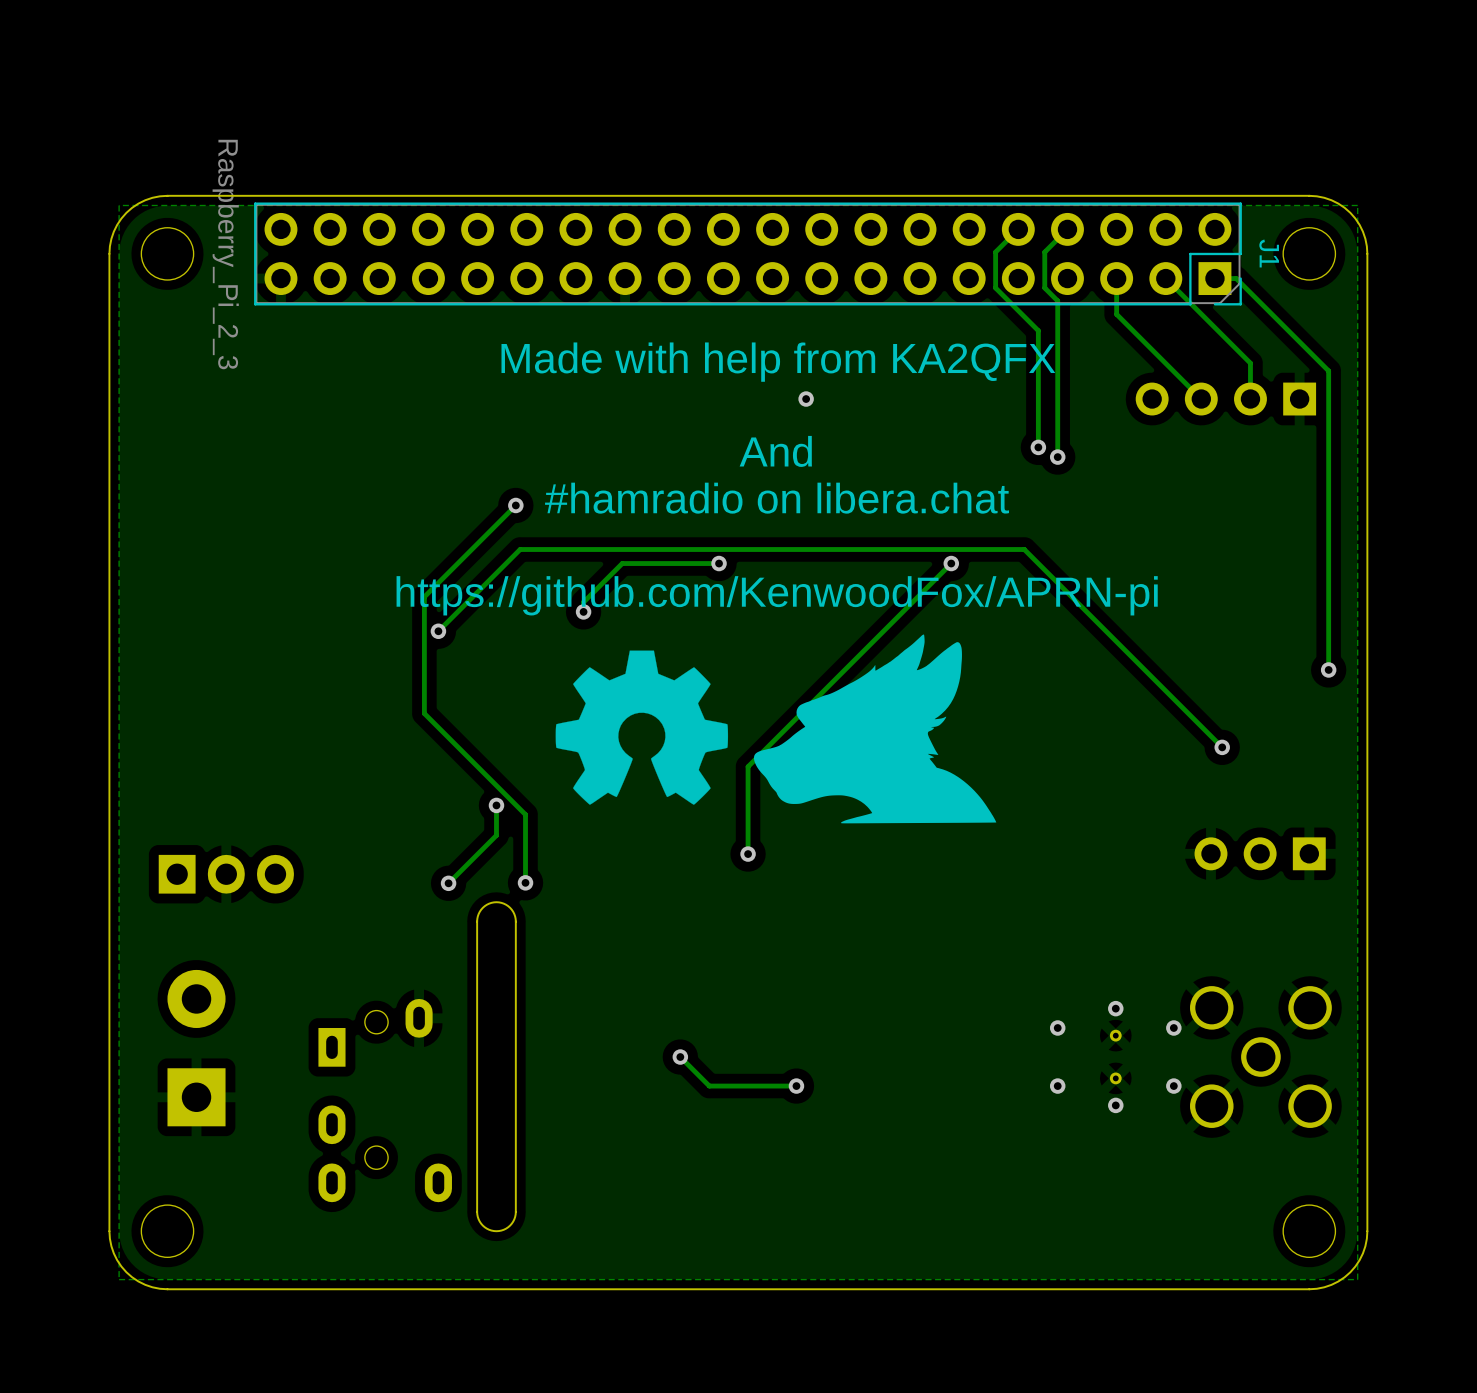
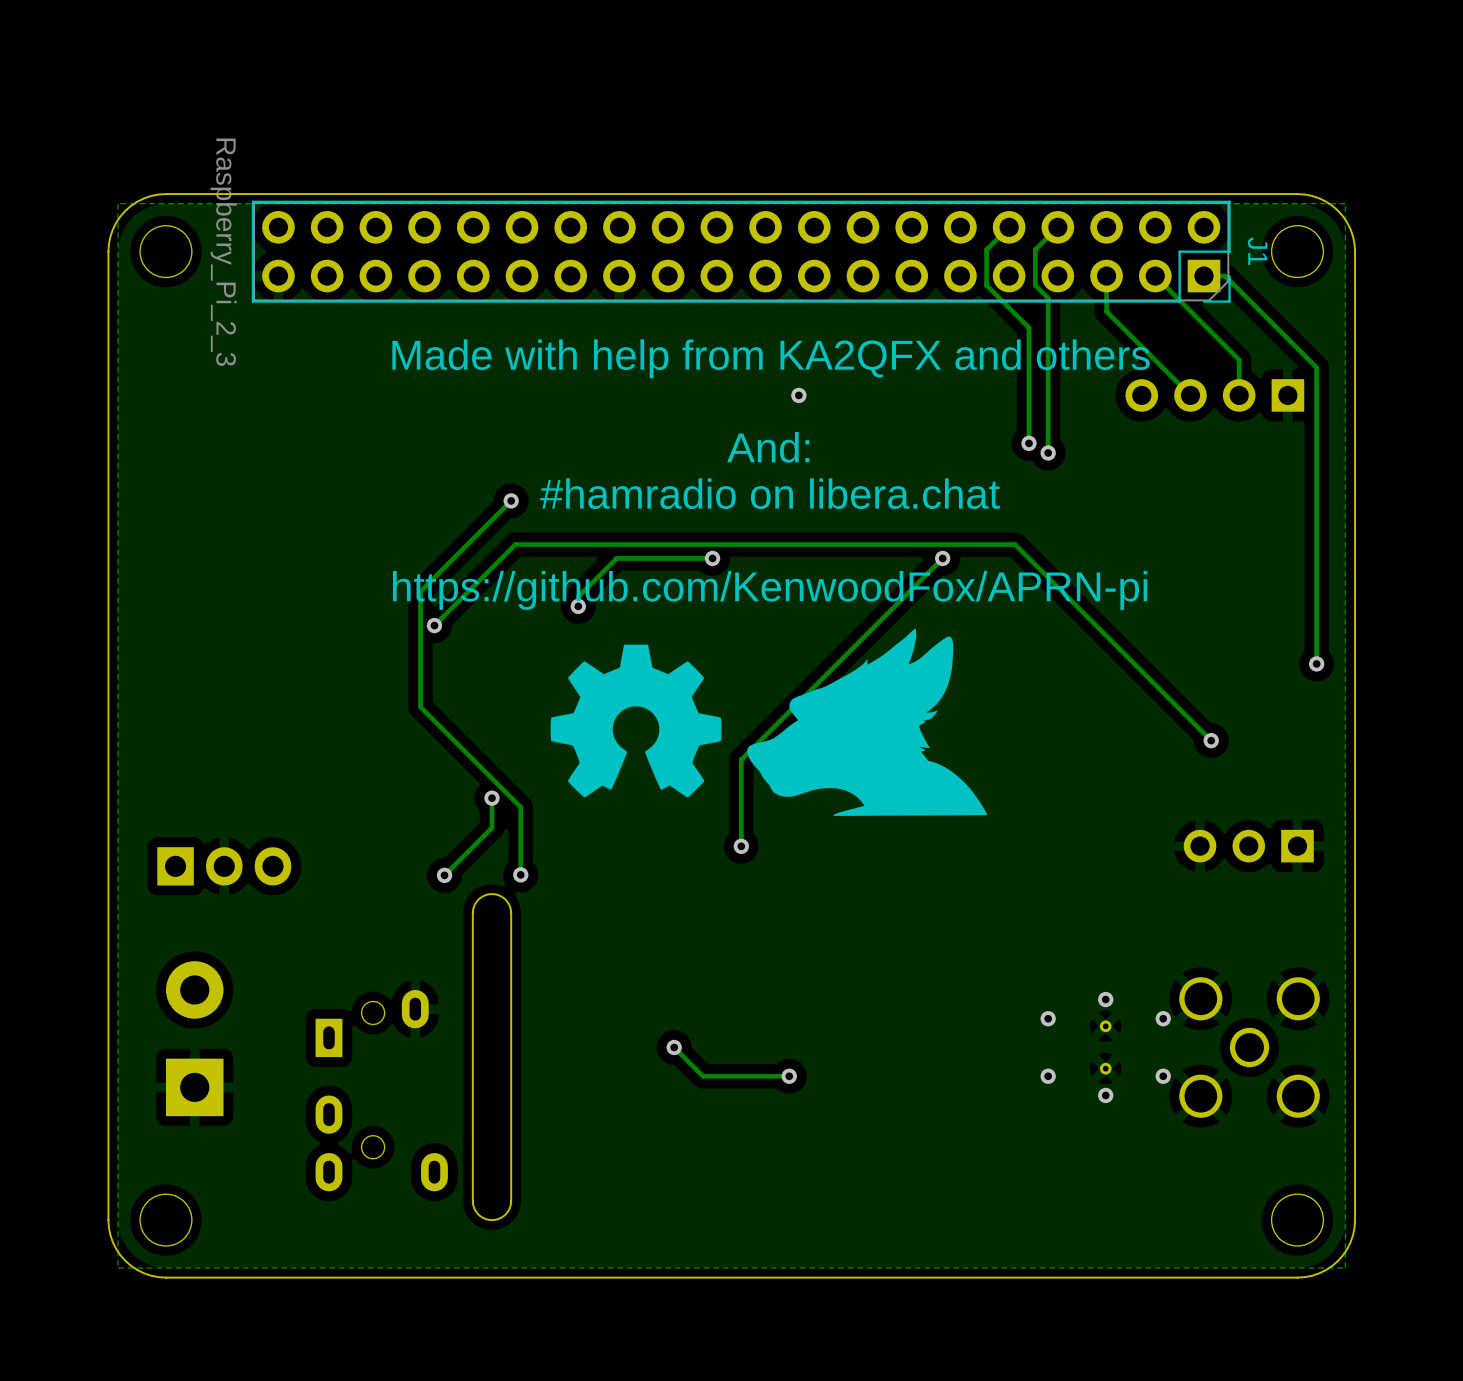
text: Made with help from KA2QFX (778, 362) -> Made with help from KA2QFX and others (771, 358)
text: And (775, 451) -> And: (768, 447)

